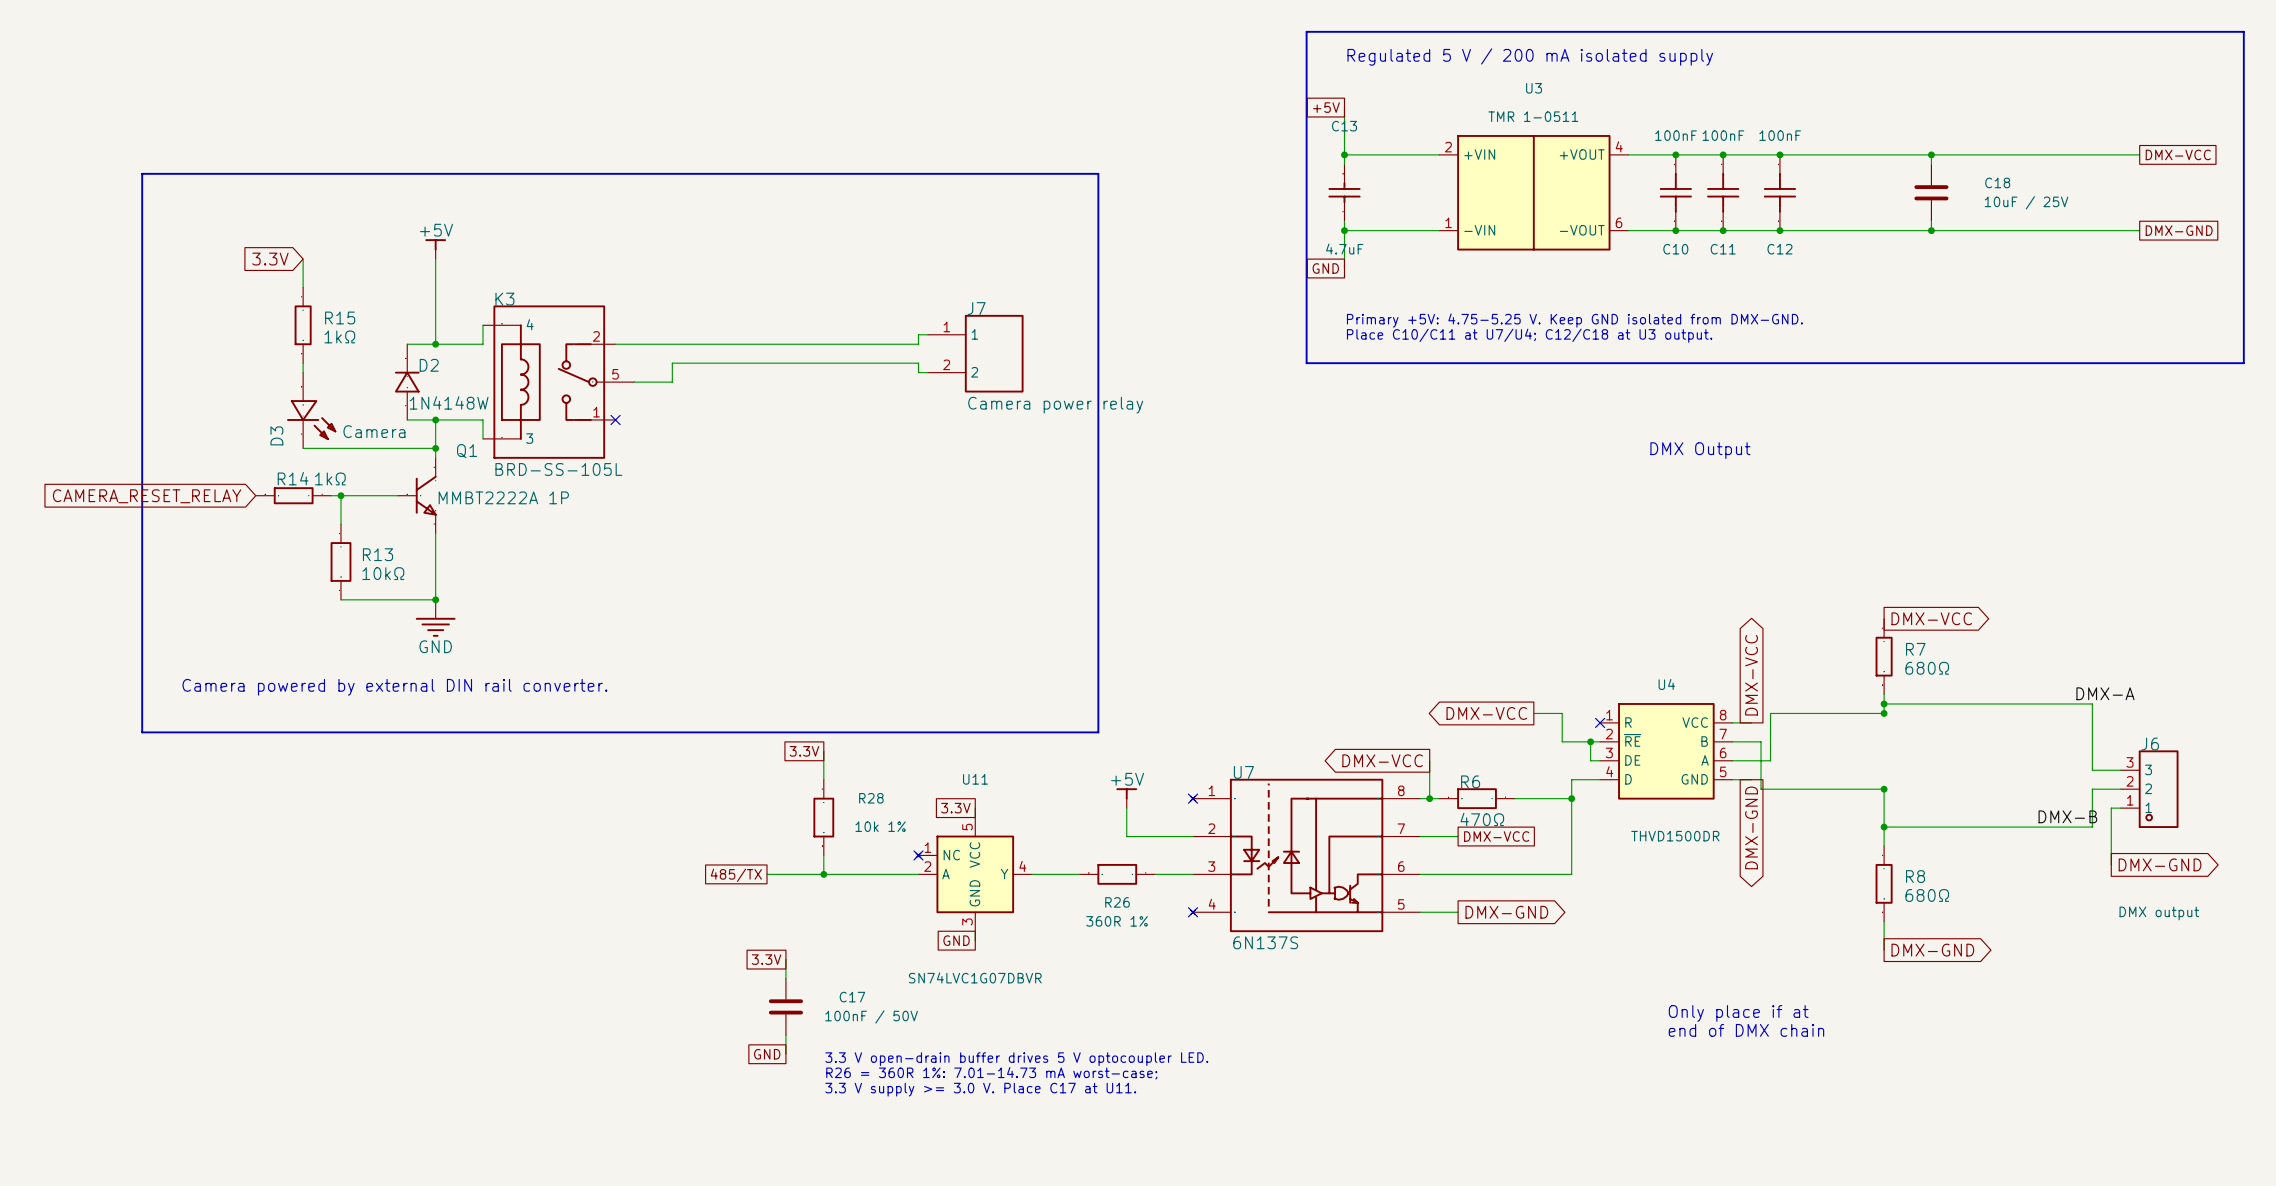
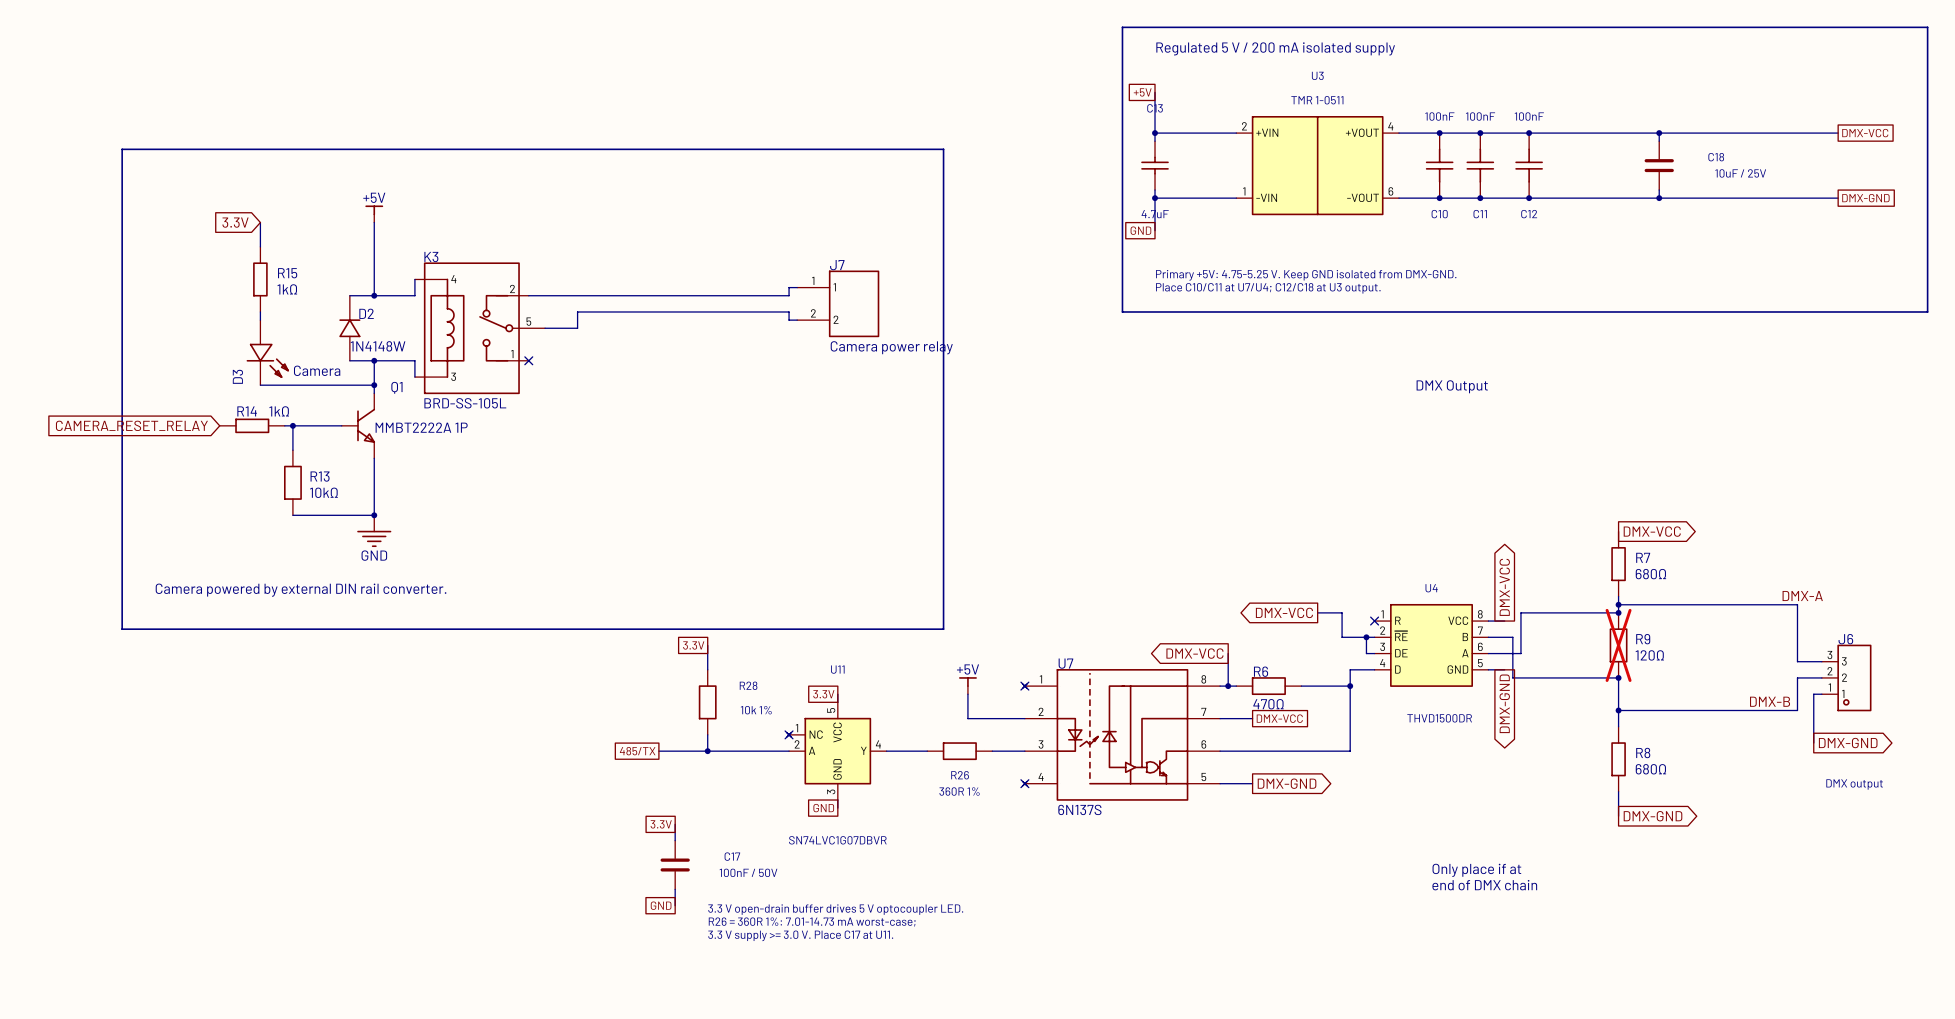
R9: none -> 120Ω (1618, 645)

